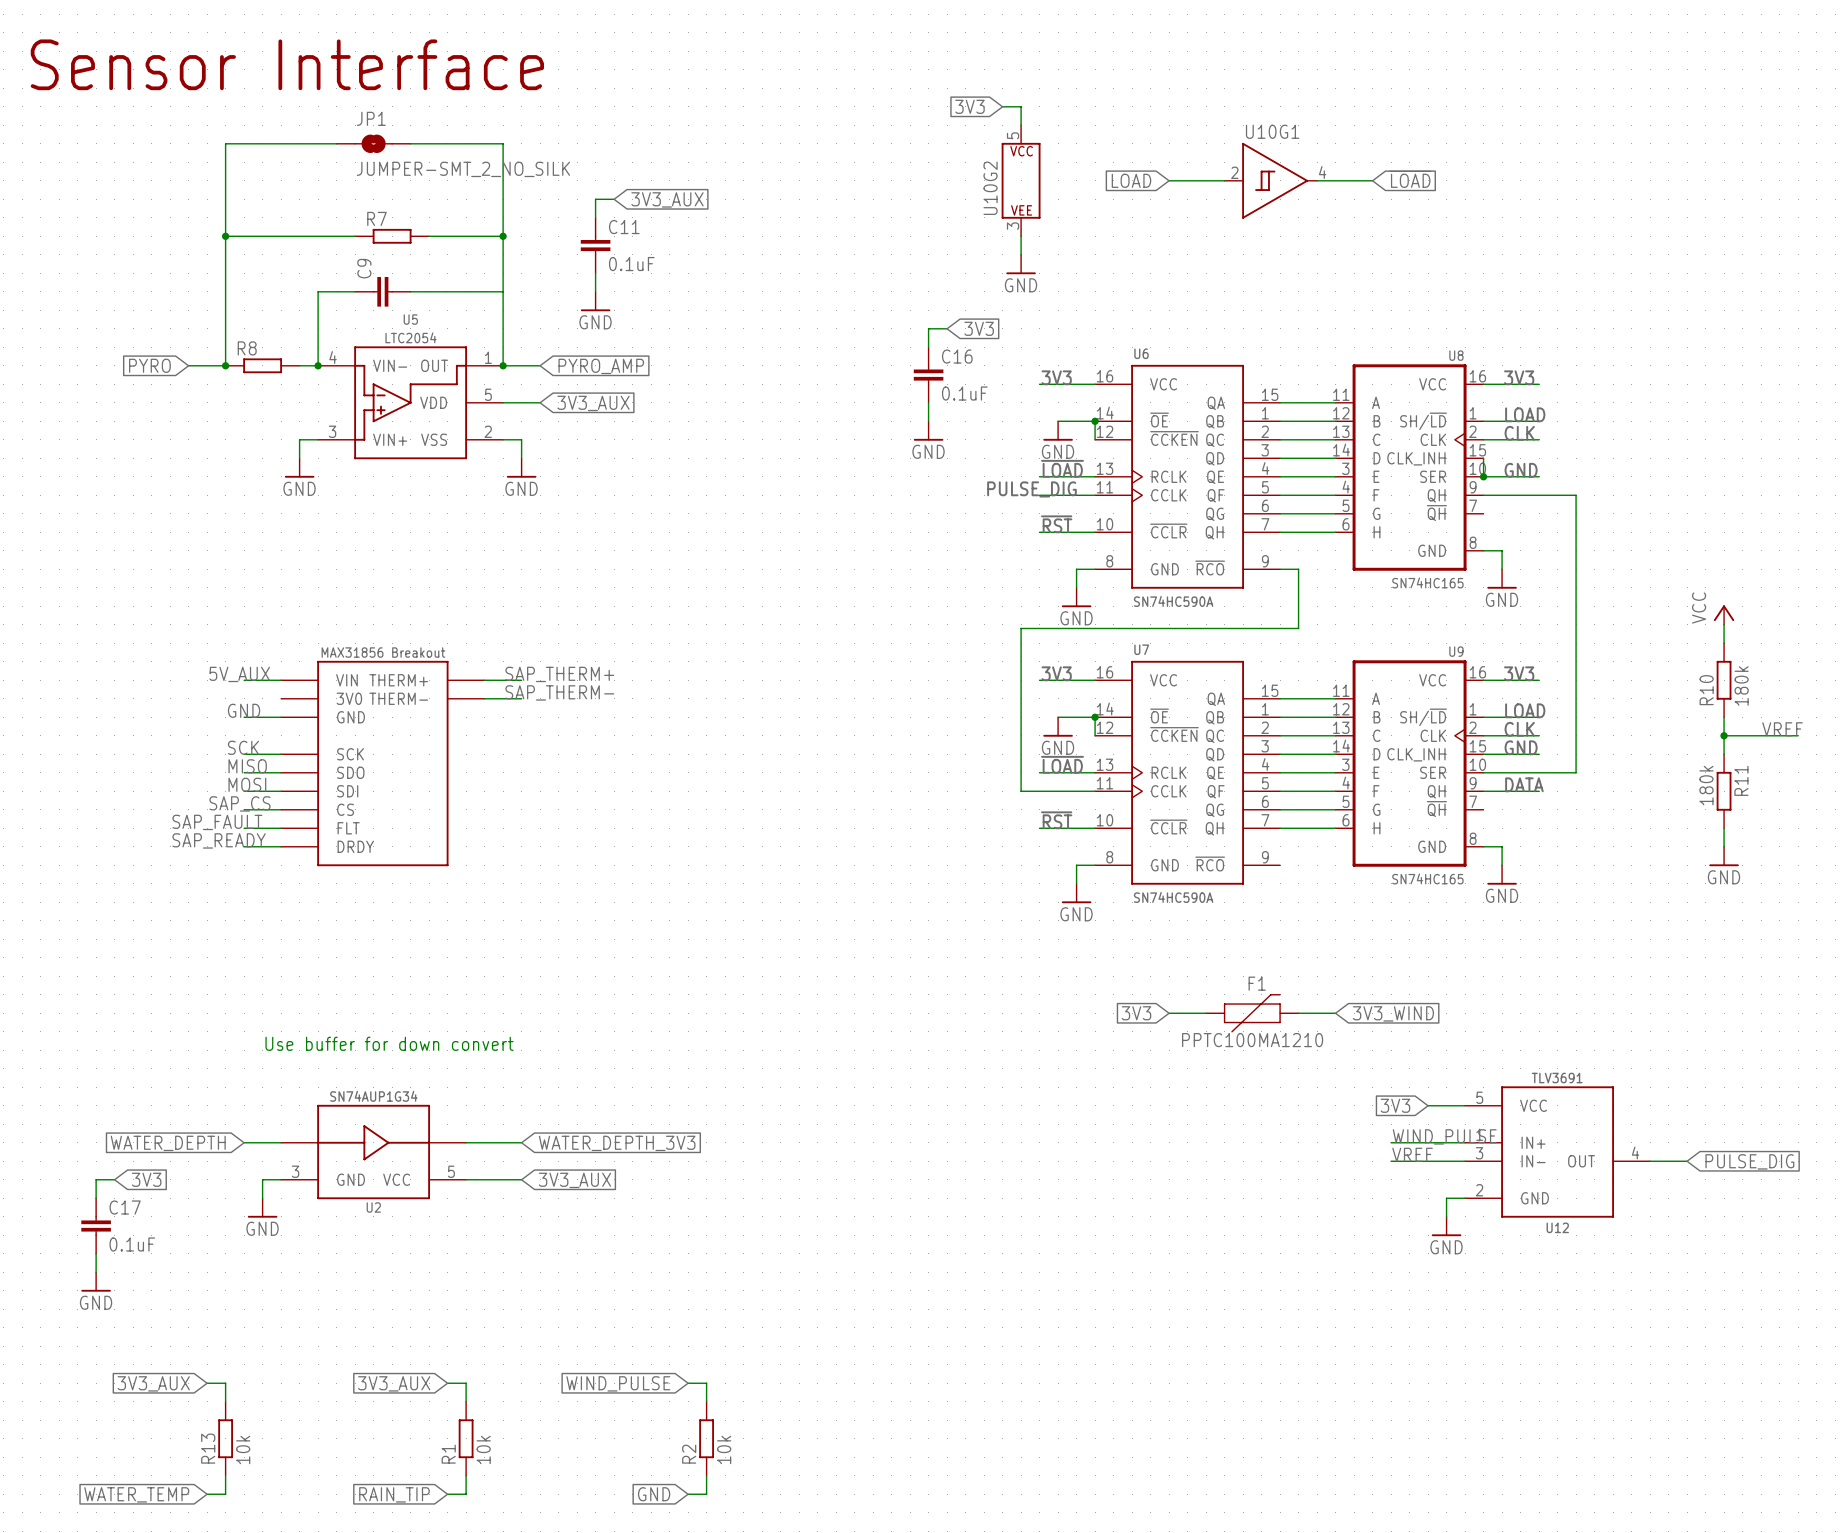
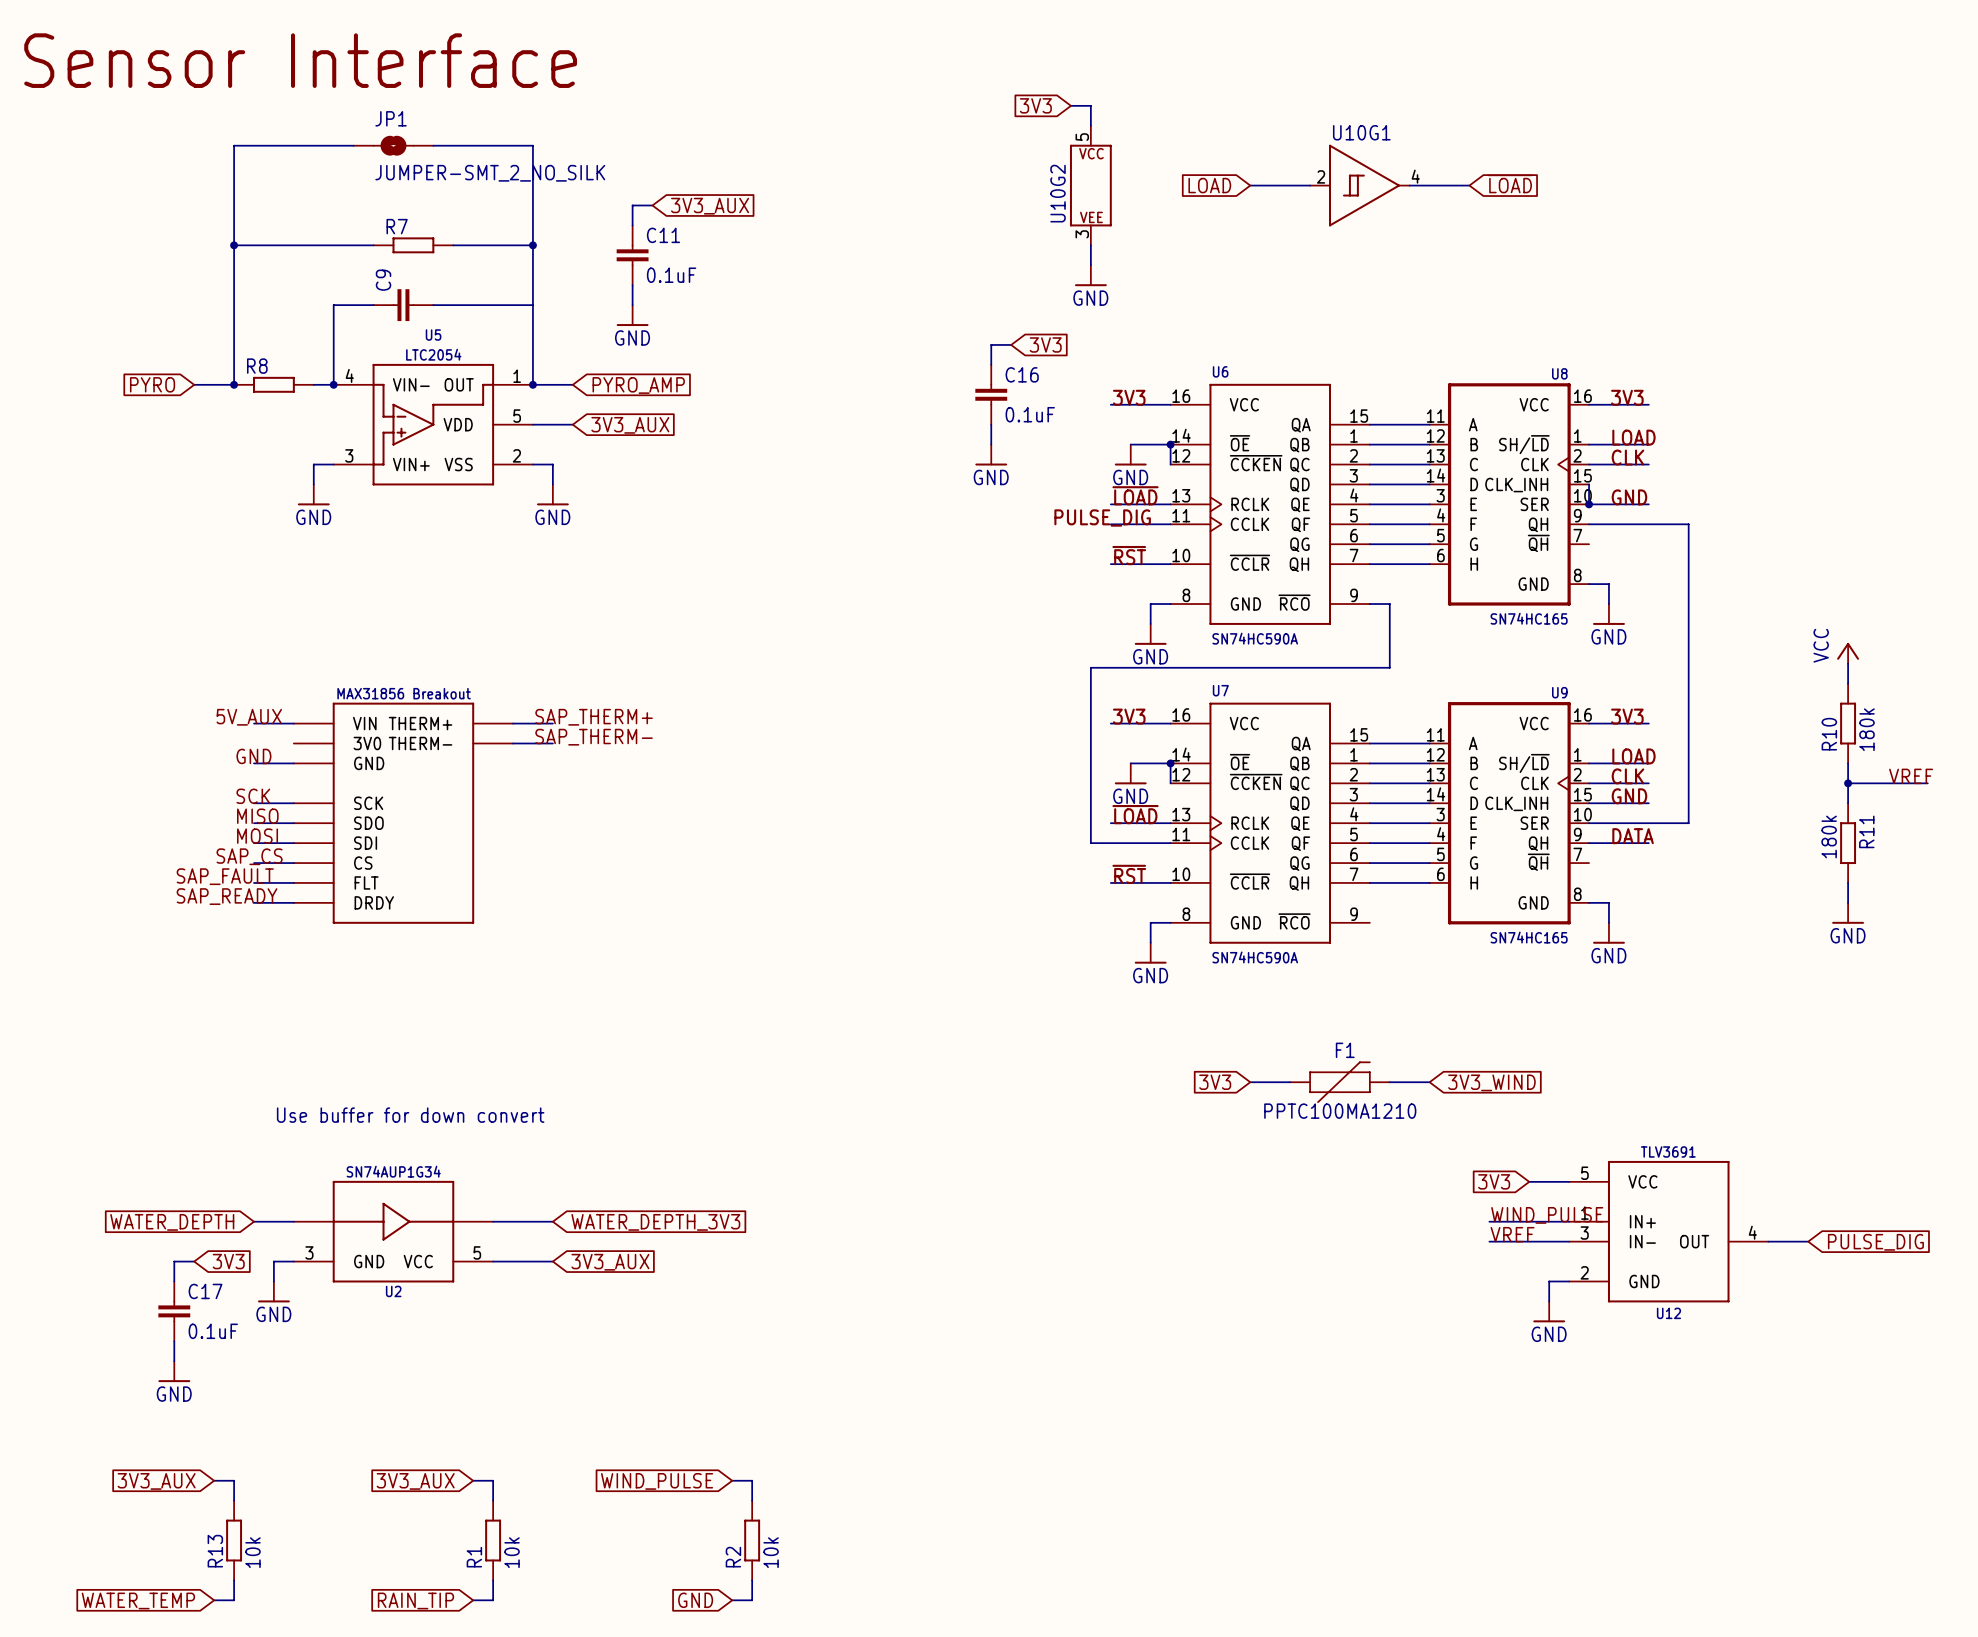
wire: (114, 1179) (96, 1179) (96, 1198) -> (194, 1261) (174, 1261) (174, 1281)
global label position: 3V3 (146, 1179) -> 3V3 (228, 1261)
C17 position: (96, 1226) -> (174, 1311)
wire: (96, 1253) (96, 1272) -> (174, 1341) (174, 1361)
power symbol position: GND (96, 1281) -> GND (174, 1371)

